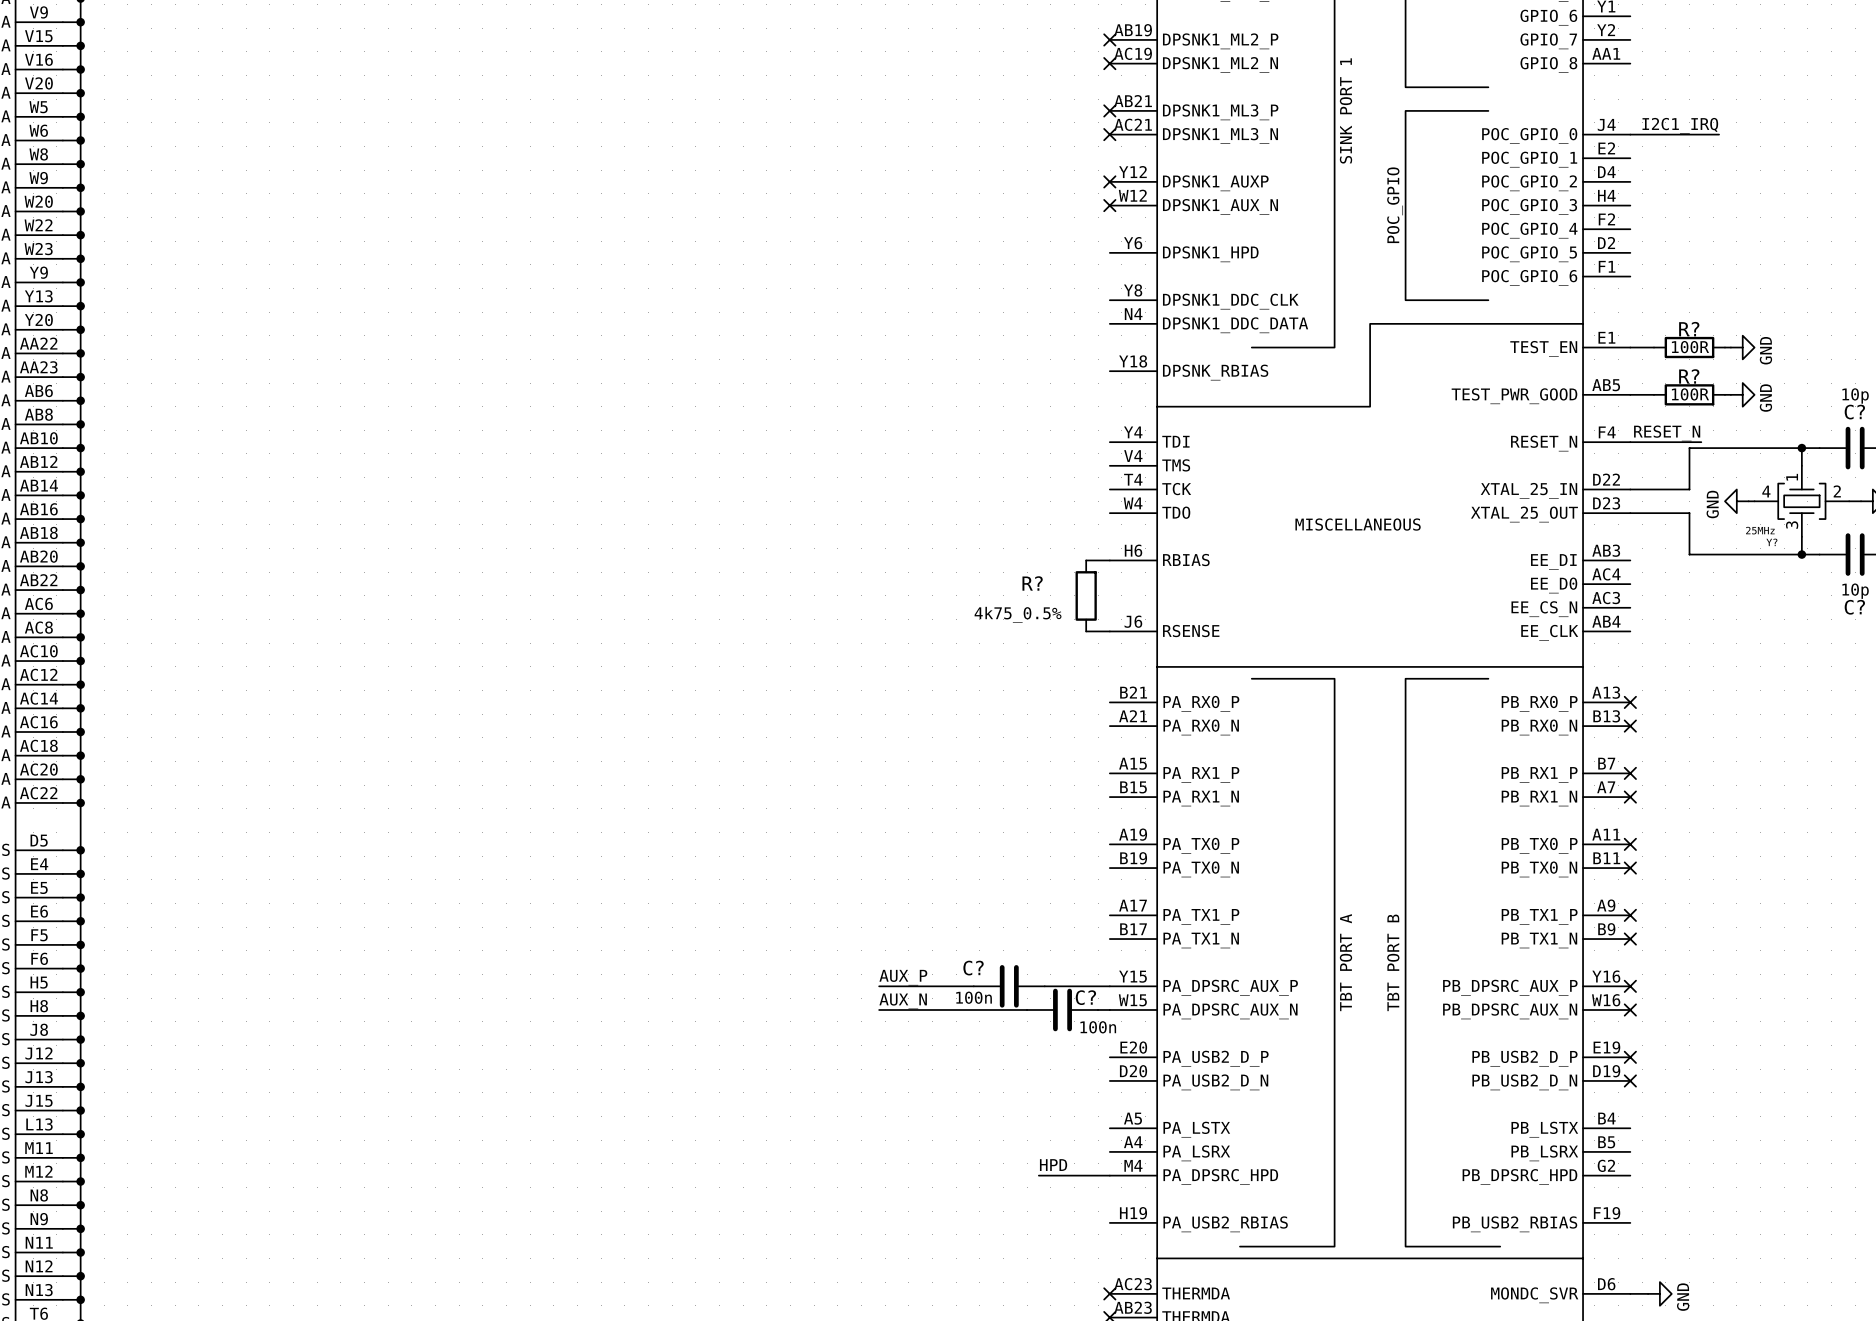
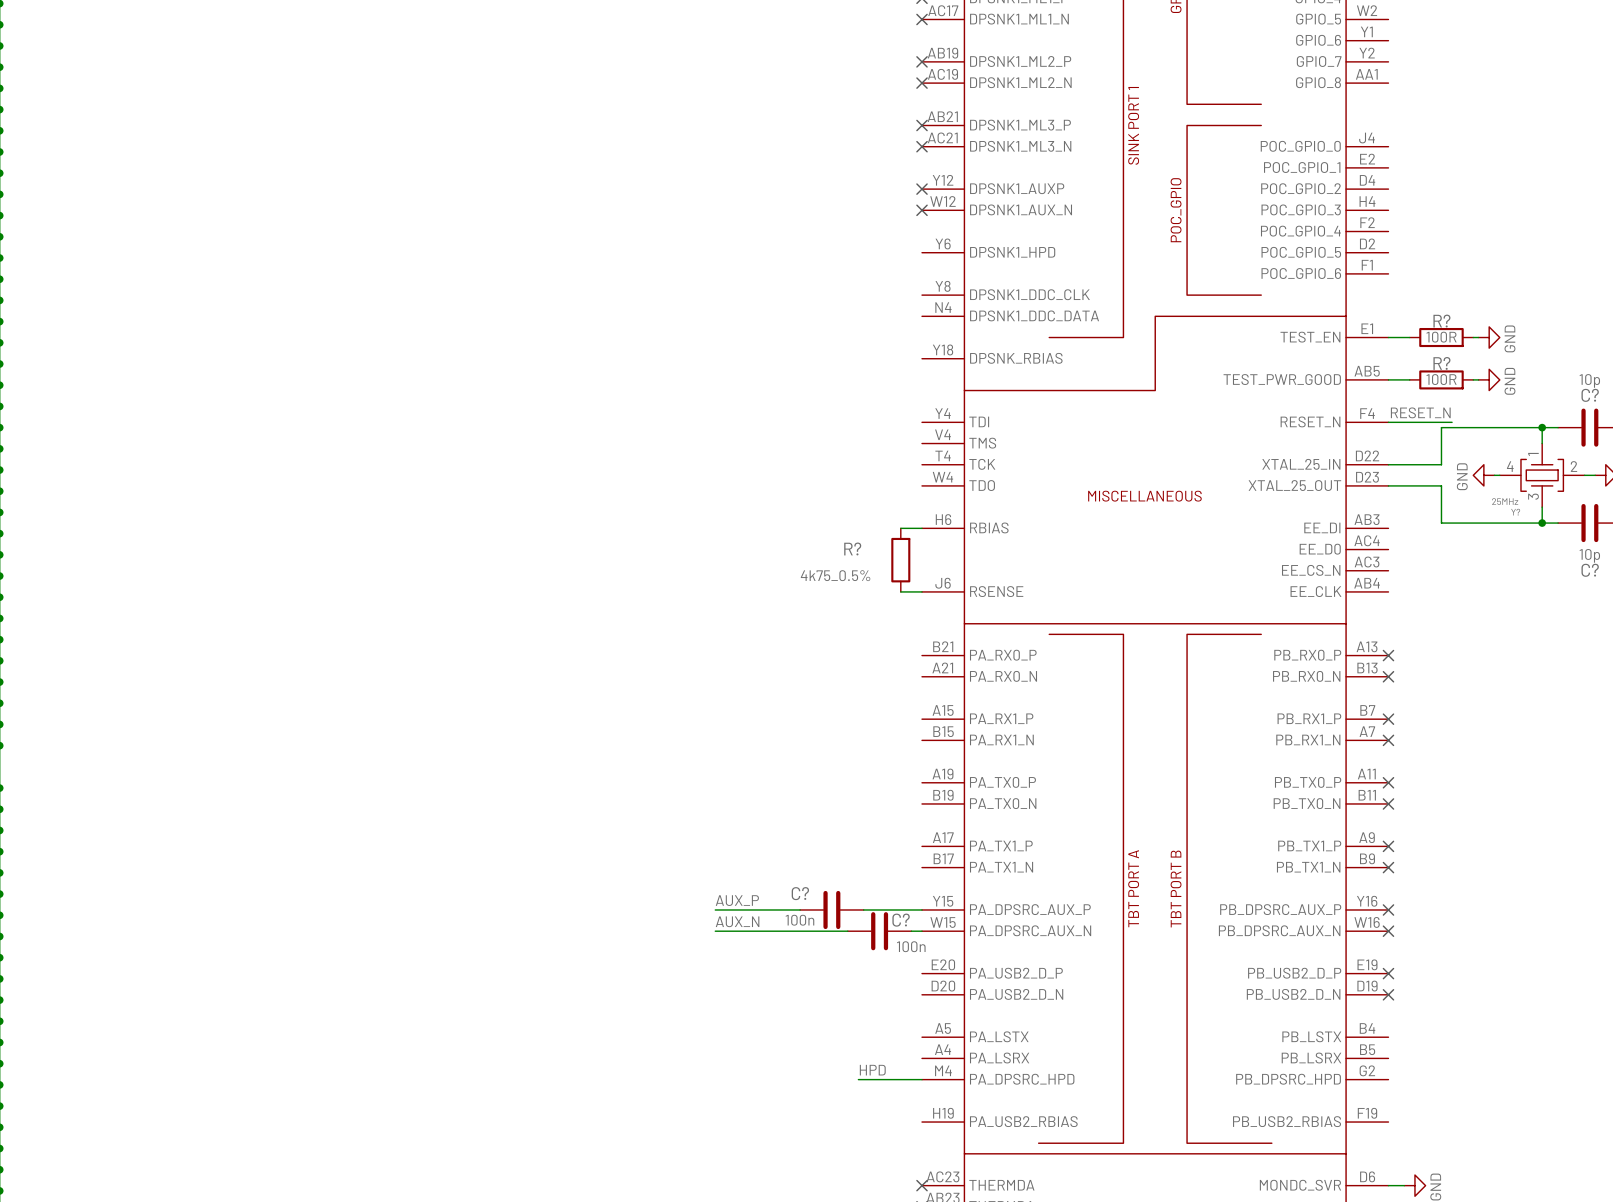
label: I2C1_IRQ (1680, 125) -> none
wire: (1630, 134) (1719, 134) -> none

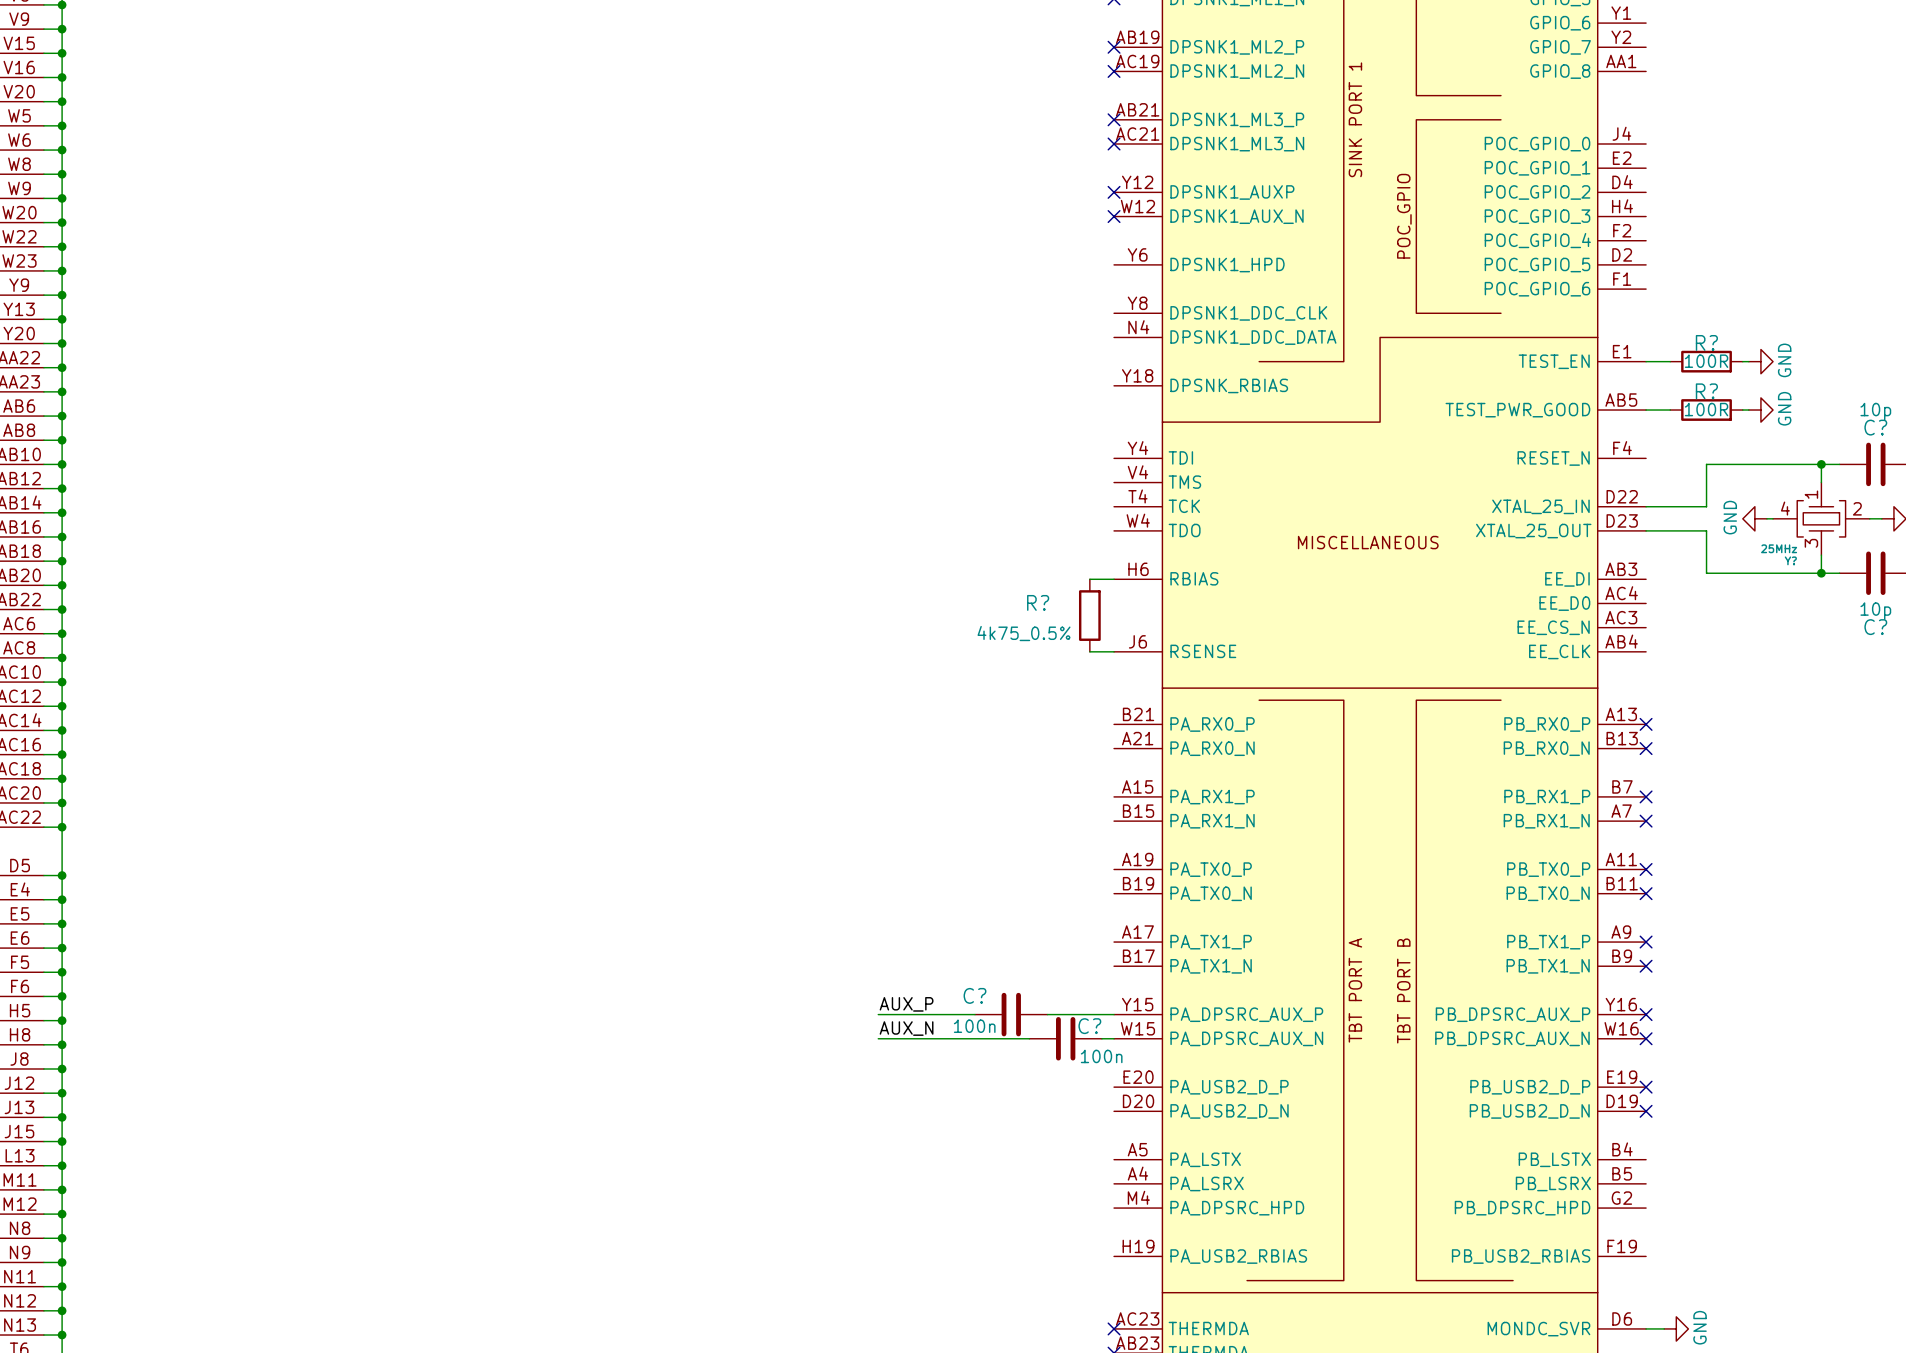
label: RESET_N (1420, 412) -> none
wire: (1388, 422) (1452, 422) -> none
label: HPD (872, 1070) -> none
wire: (858, 1079) (922, 1079) -> none

